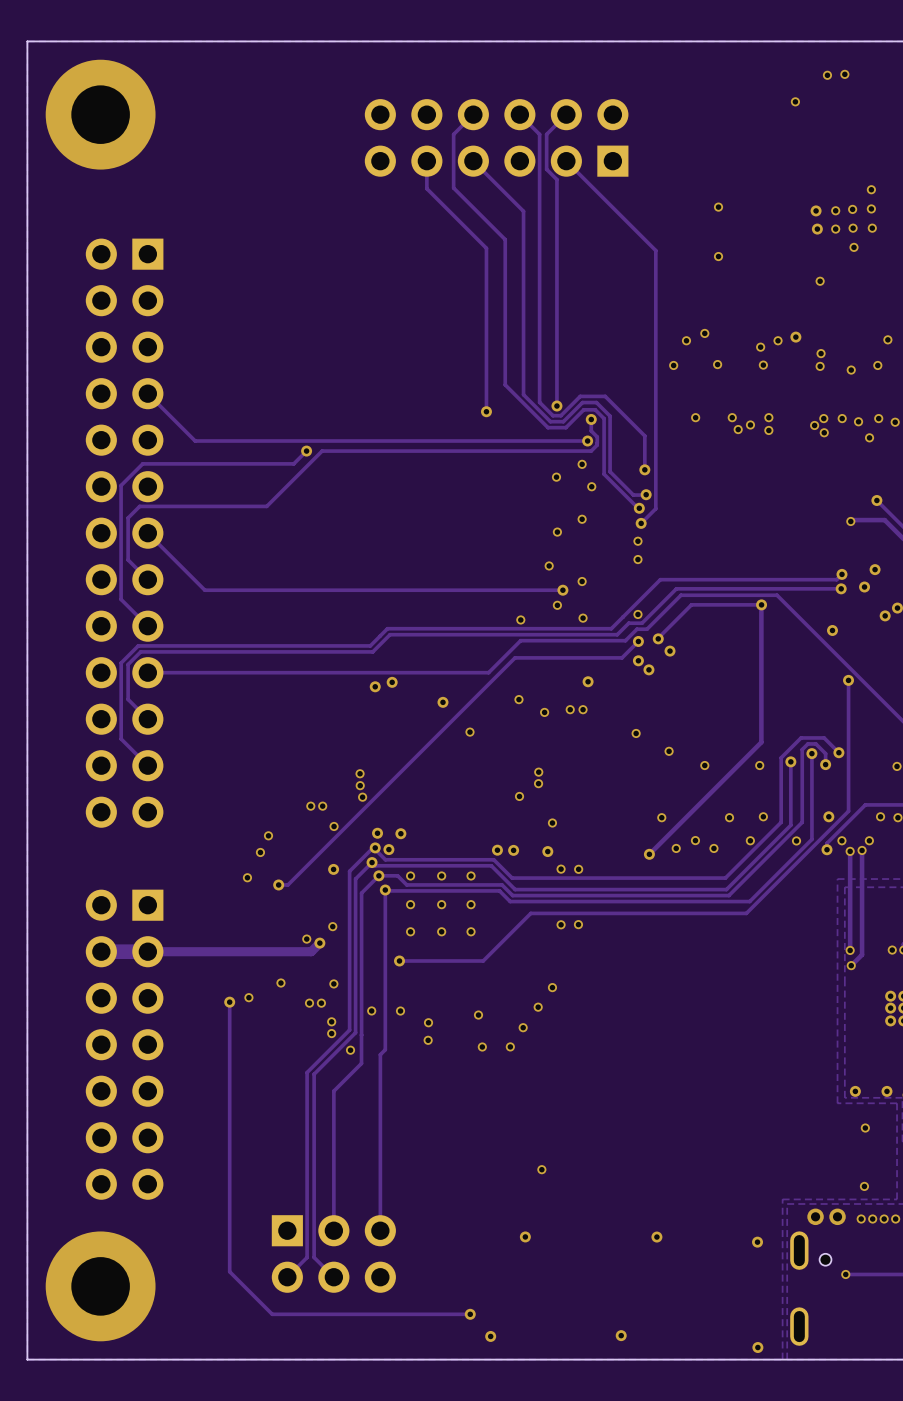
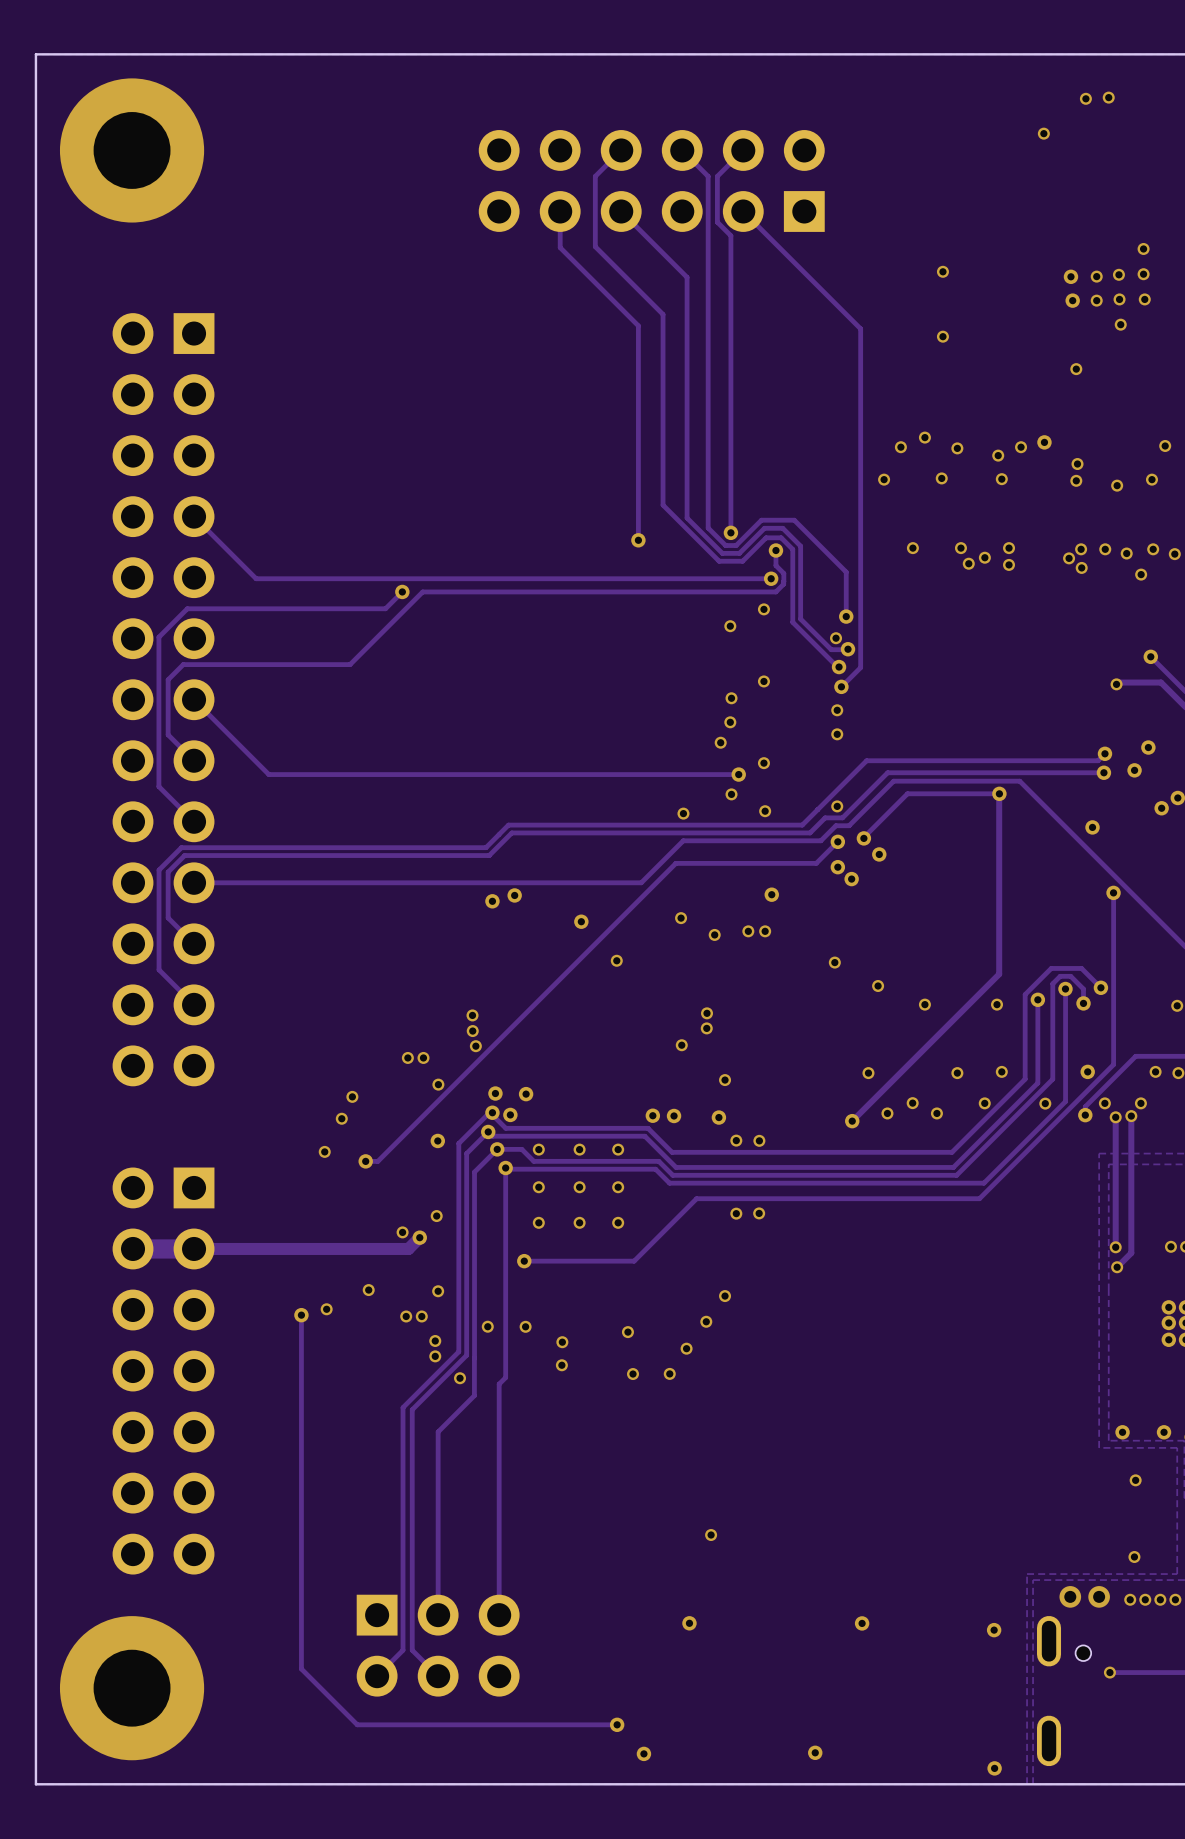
via: none -> (957, 448)
via: (591, 486) -> none
via: none -> (836, 638)
via: none -> (730, 722)

